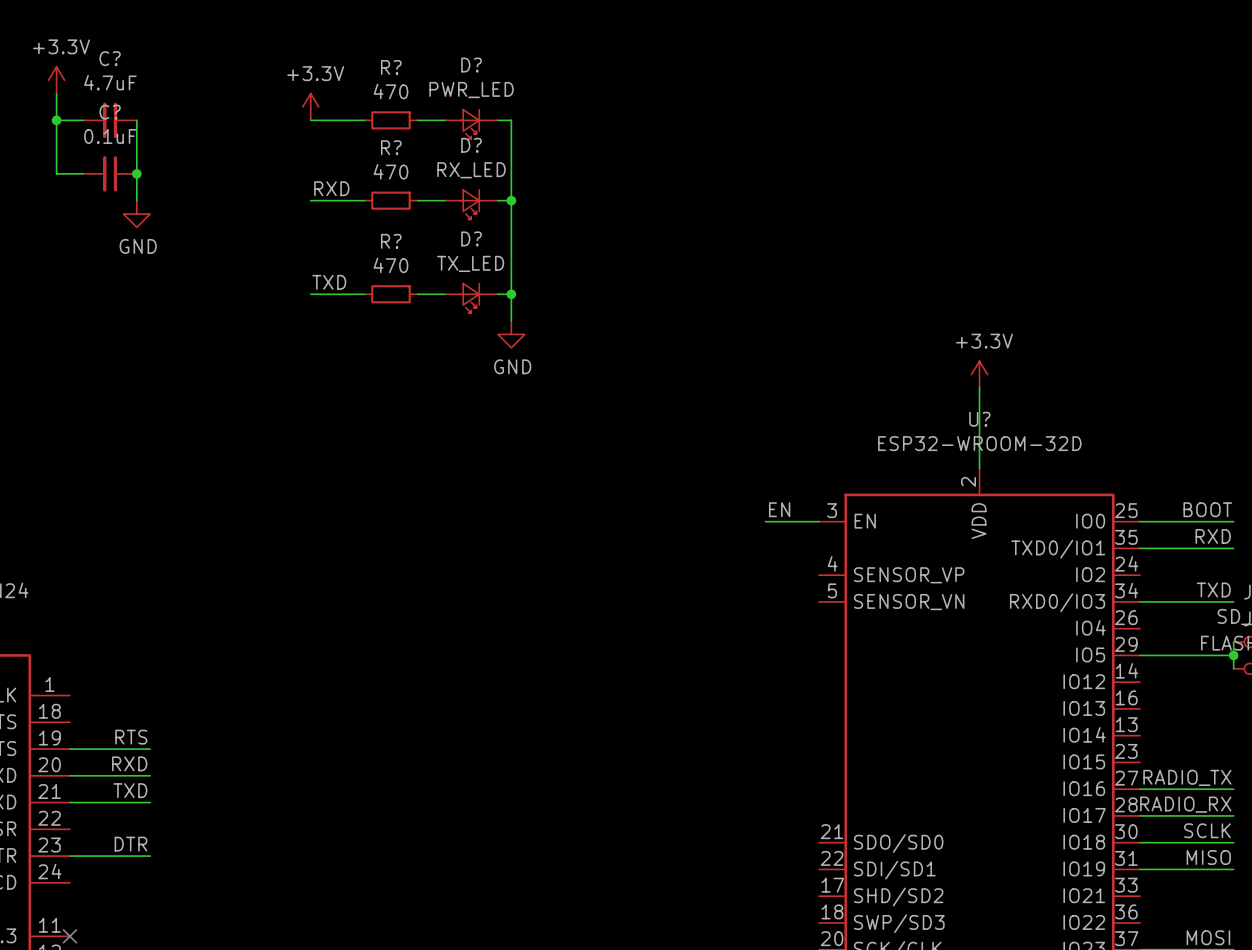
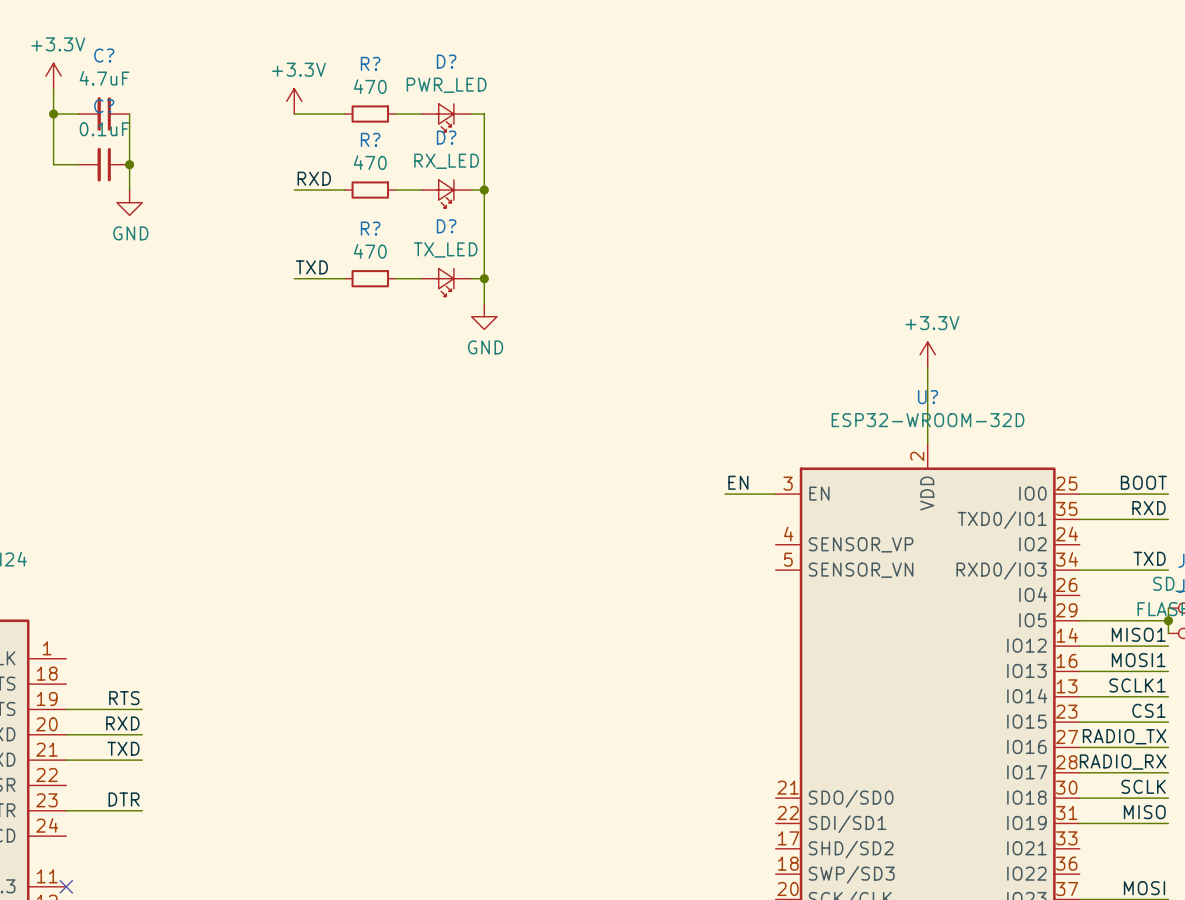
label: none -> MISO1 (1138, 634)
wire: none -> (1079, 646) (1168, 646)
label: none -> MOSI1 (1138, 660)
wire: none -> (1079, 671) (1168, 671)
label: none -> SCLK1 (1137, 685)
wire: none -> (1079, 696) (1168, 696)
label: none -> CS1 (1149, 710)
wire: none -> (1079, 722) (1168, 722)

